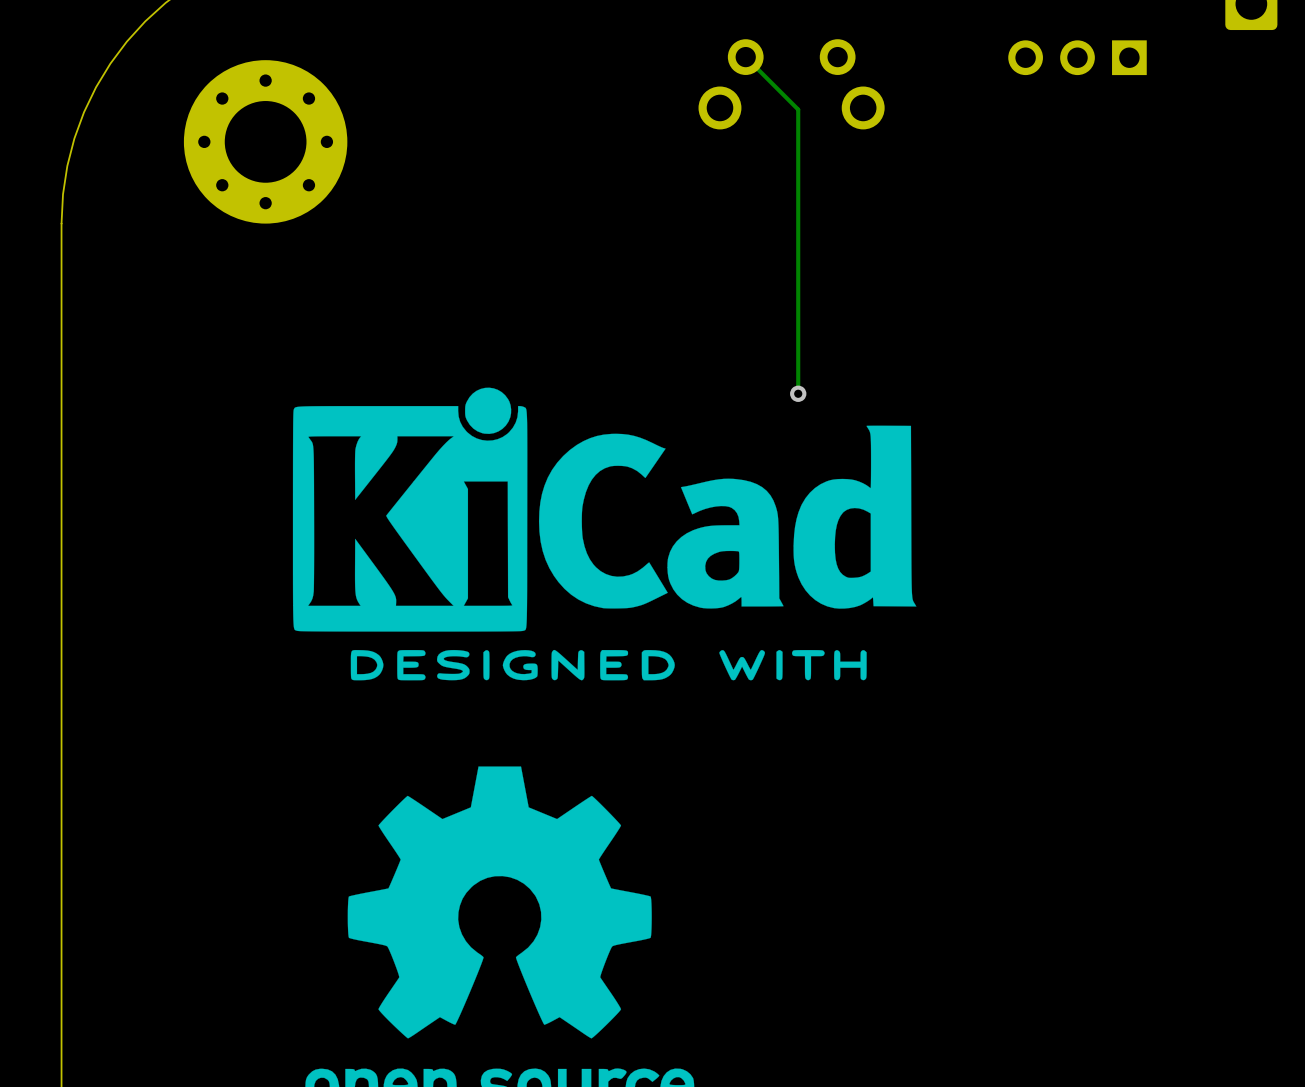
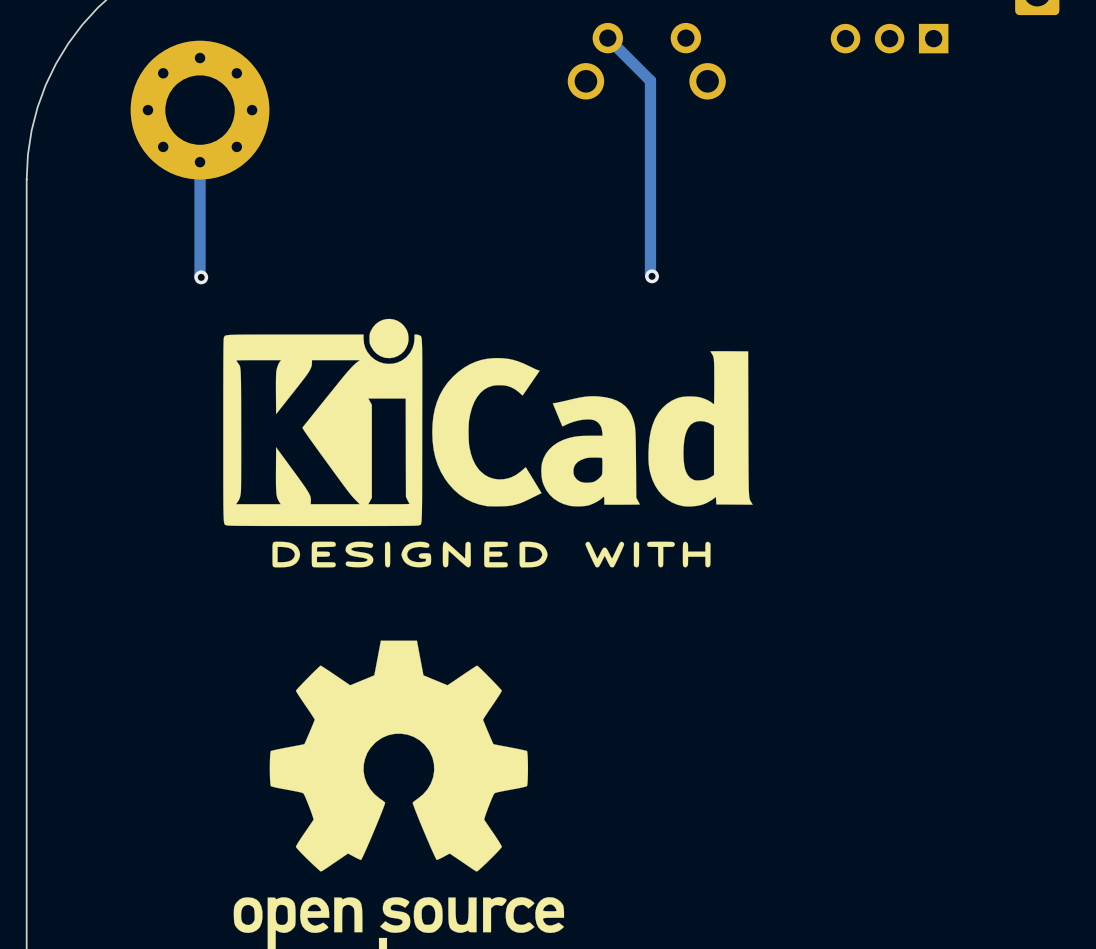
track width: thin (745, 57) (795, 107) -> thick (607, 38) (650, 80)
track: (795, 107) (798, 109) (798, 393) -> (650, 80) (650, 274) (652, 276)
track: none -> (200, 110) (201, 277)
via: none -> (201, 277)
via position: (798, 393) -> (652, 276)

